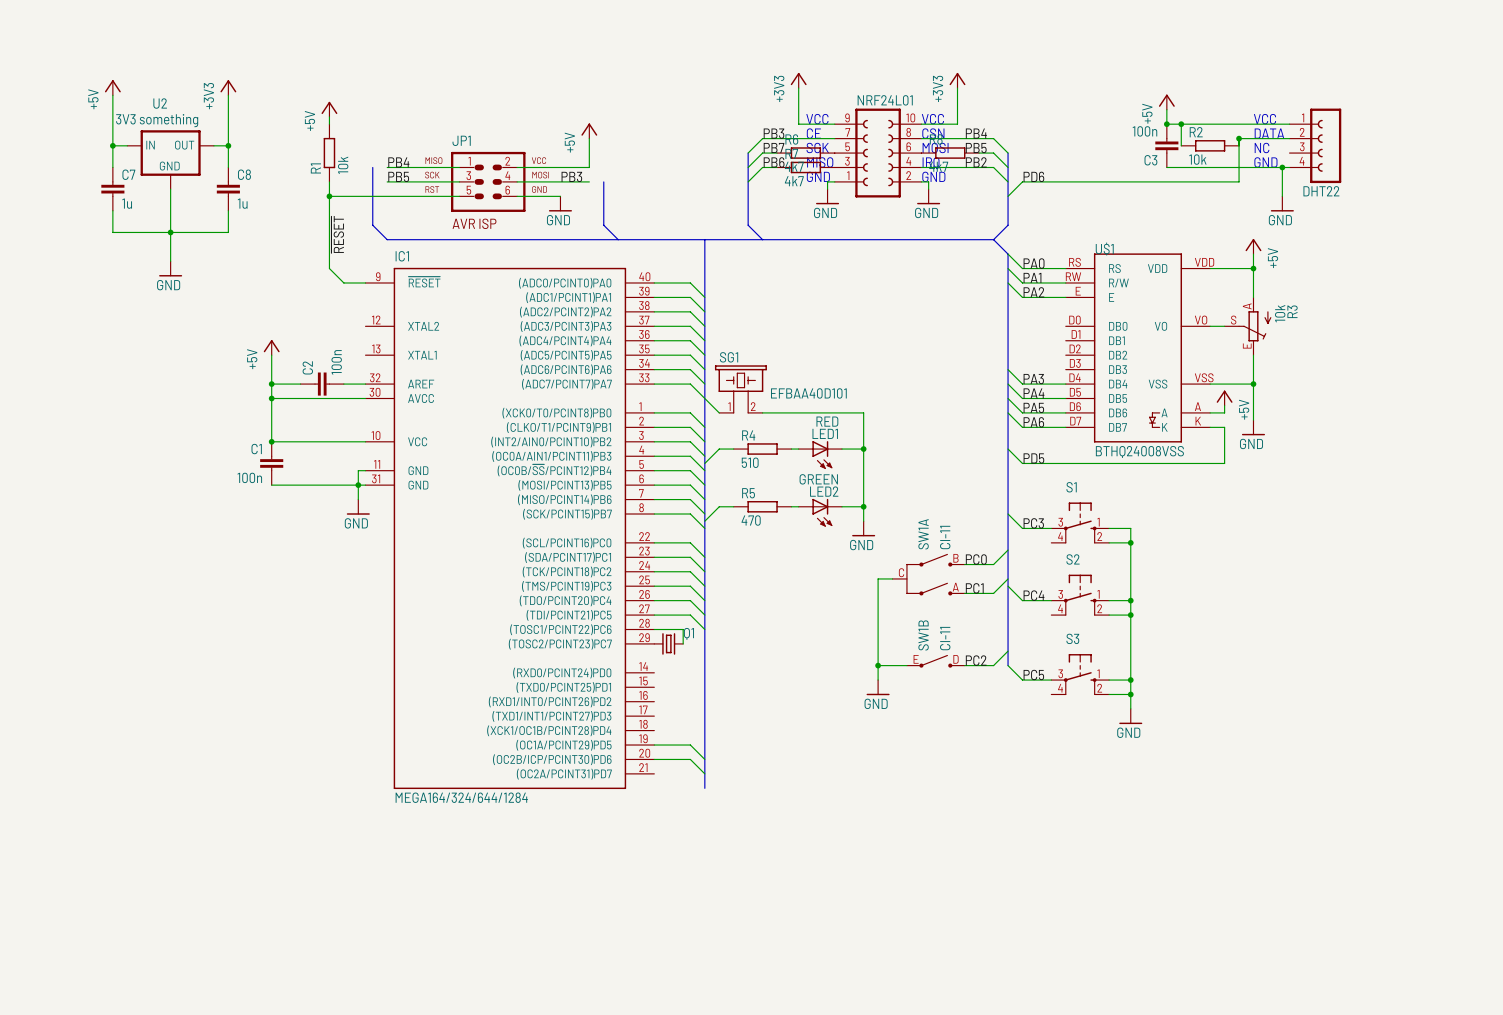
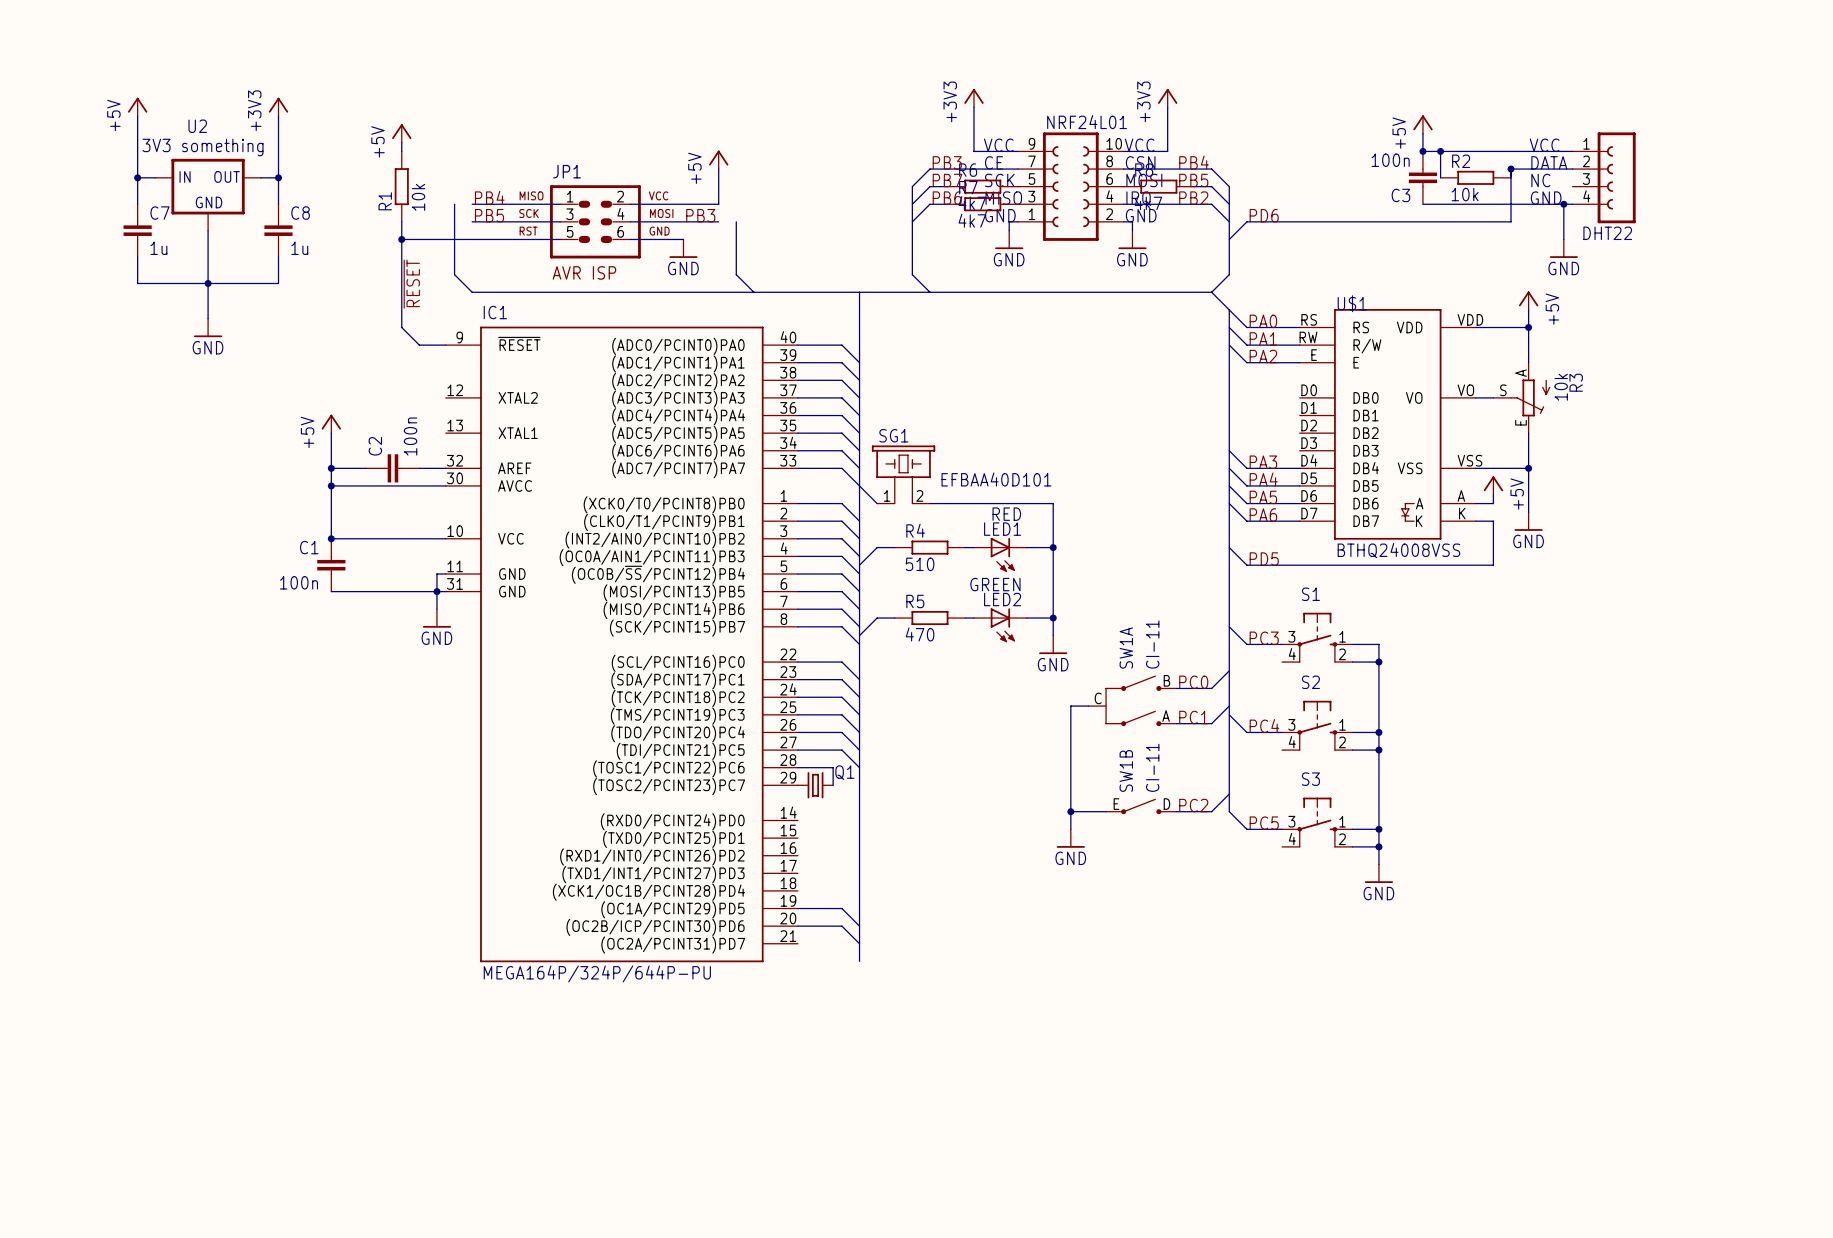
IC1 value: MEGA164/324/644/1284 (461, 797) -> MEGA164P/324P/644P-PU (597, 973)

